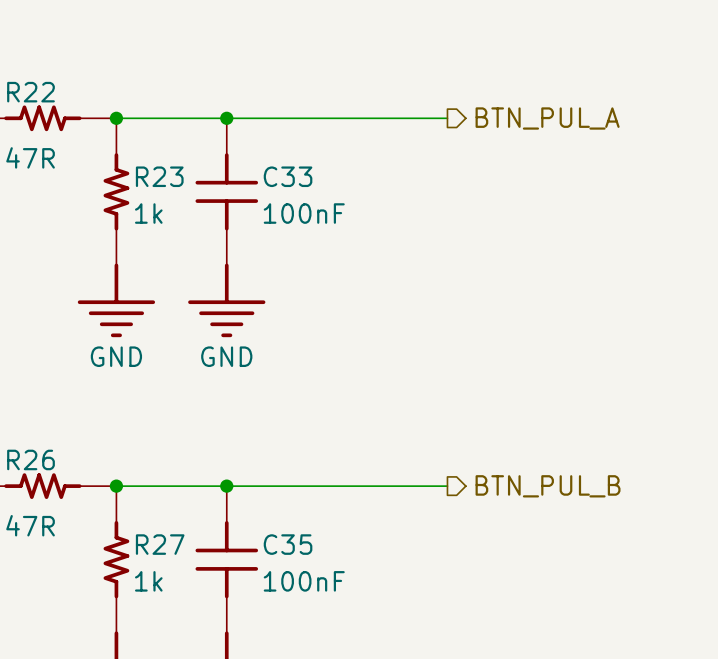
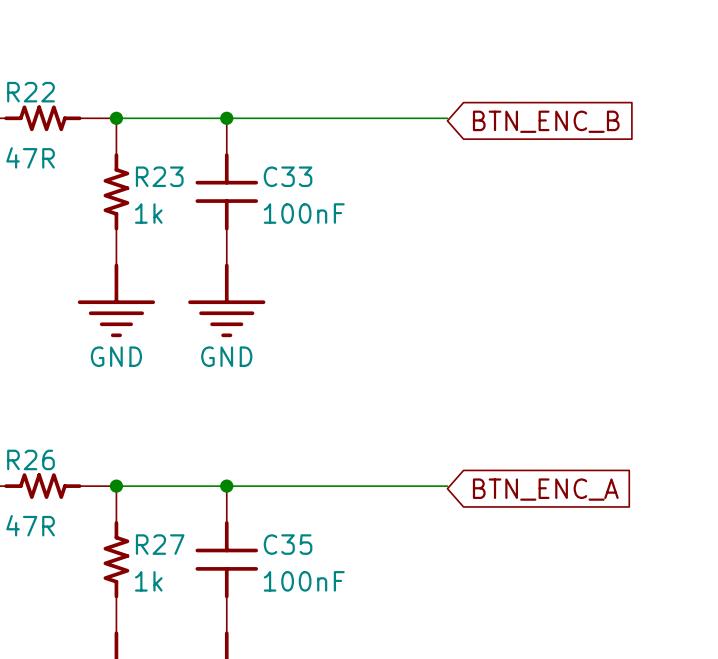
hierarchical label: BTN_PUL_A (547, 118) -> none
global label: none -> BTN_ENC_B (546, 121)
hierarchical label: BTN_PUL_B (548, 486) -> none
global label: none -> BTN_ENC_A (545, 489)

